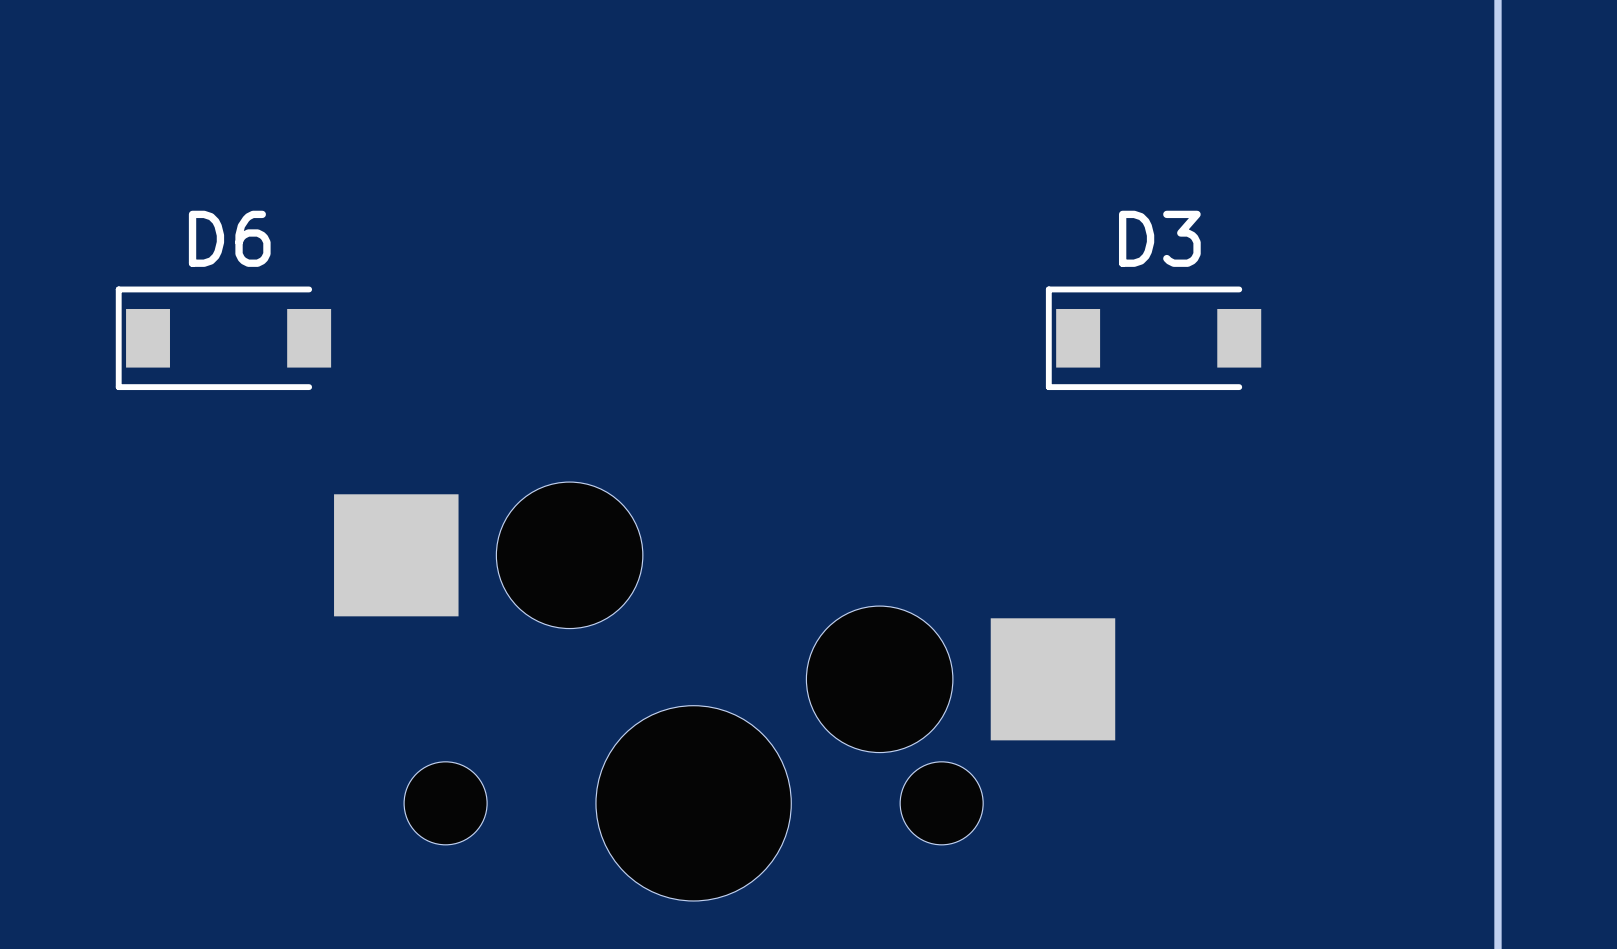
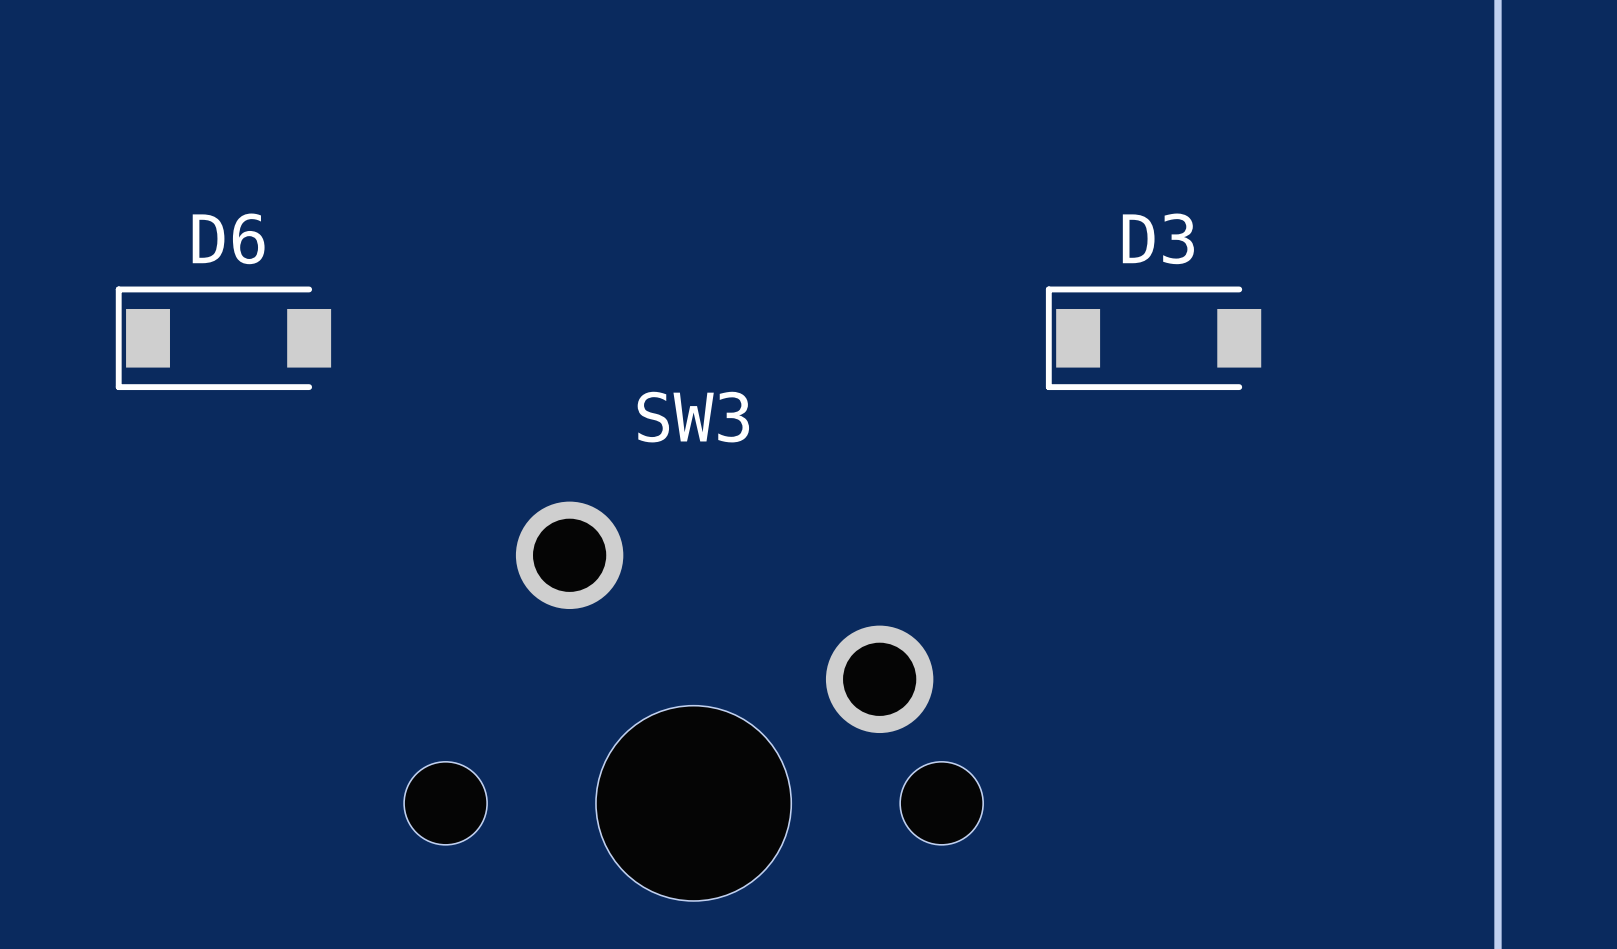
part: (724, 691) -> none
SW3: none -> (693, 701)

